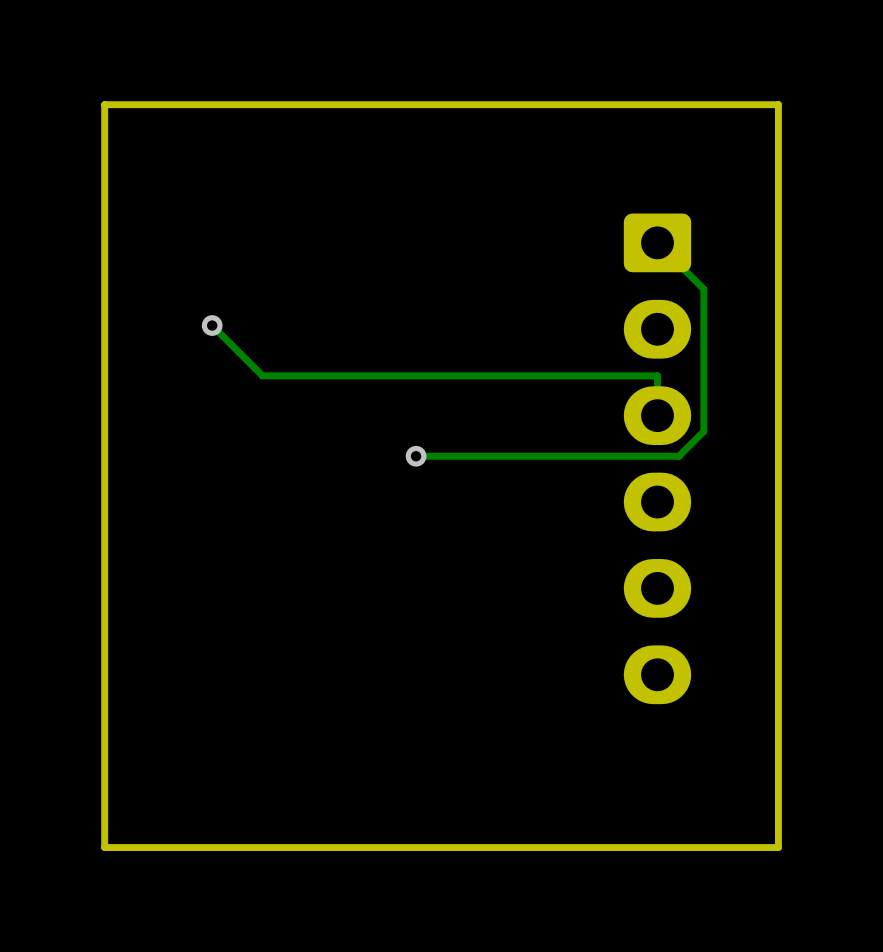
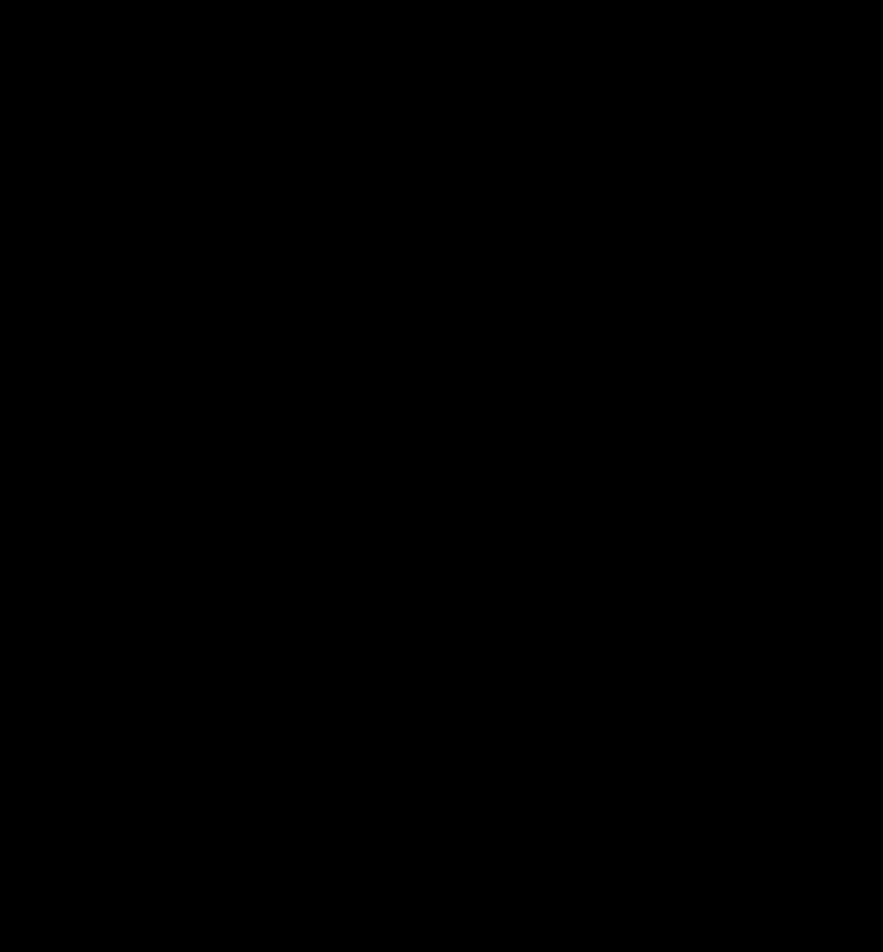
board edge: (778, 104) (104, 104) (104, 847) (778, 847) (778, 104) -> none
track: (657, 242) (703, 289) (703, 431) (678, 456) (416, 456) -> none
track: (212, 325) (262, 375) (657, 375) (657, 415) -> none
via: (212, 325) -> none
via: (416, 456) -> none
part: (657, 458) -> none

